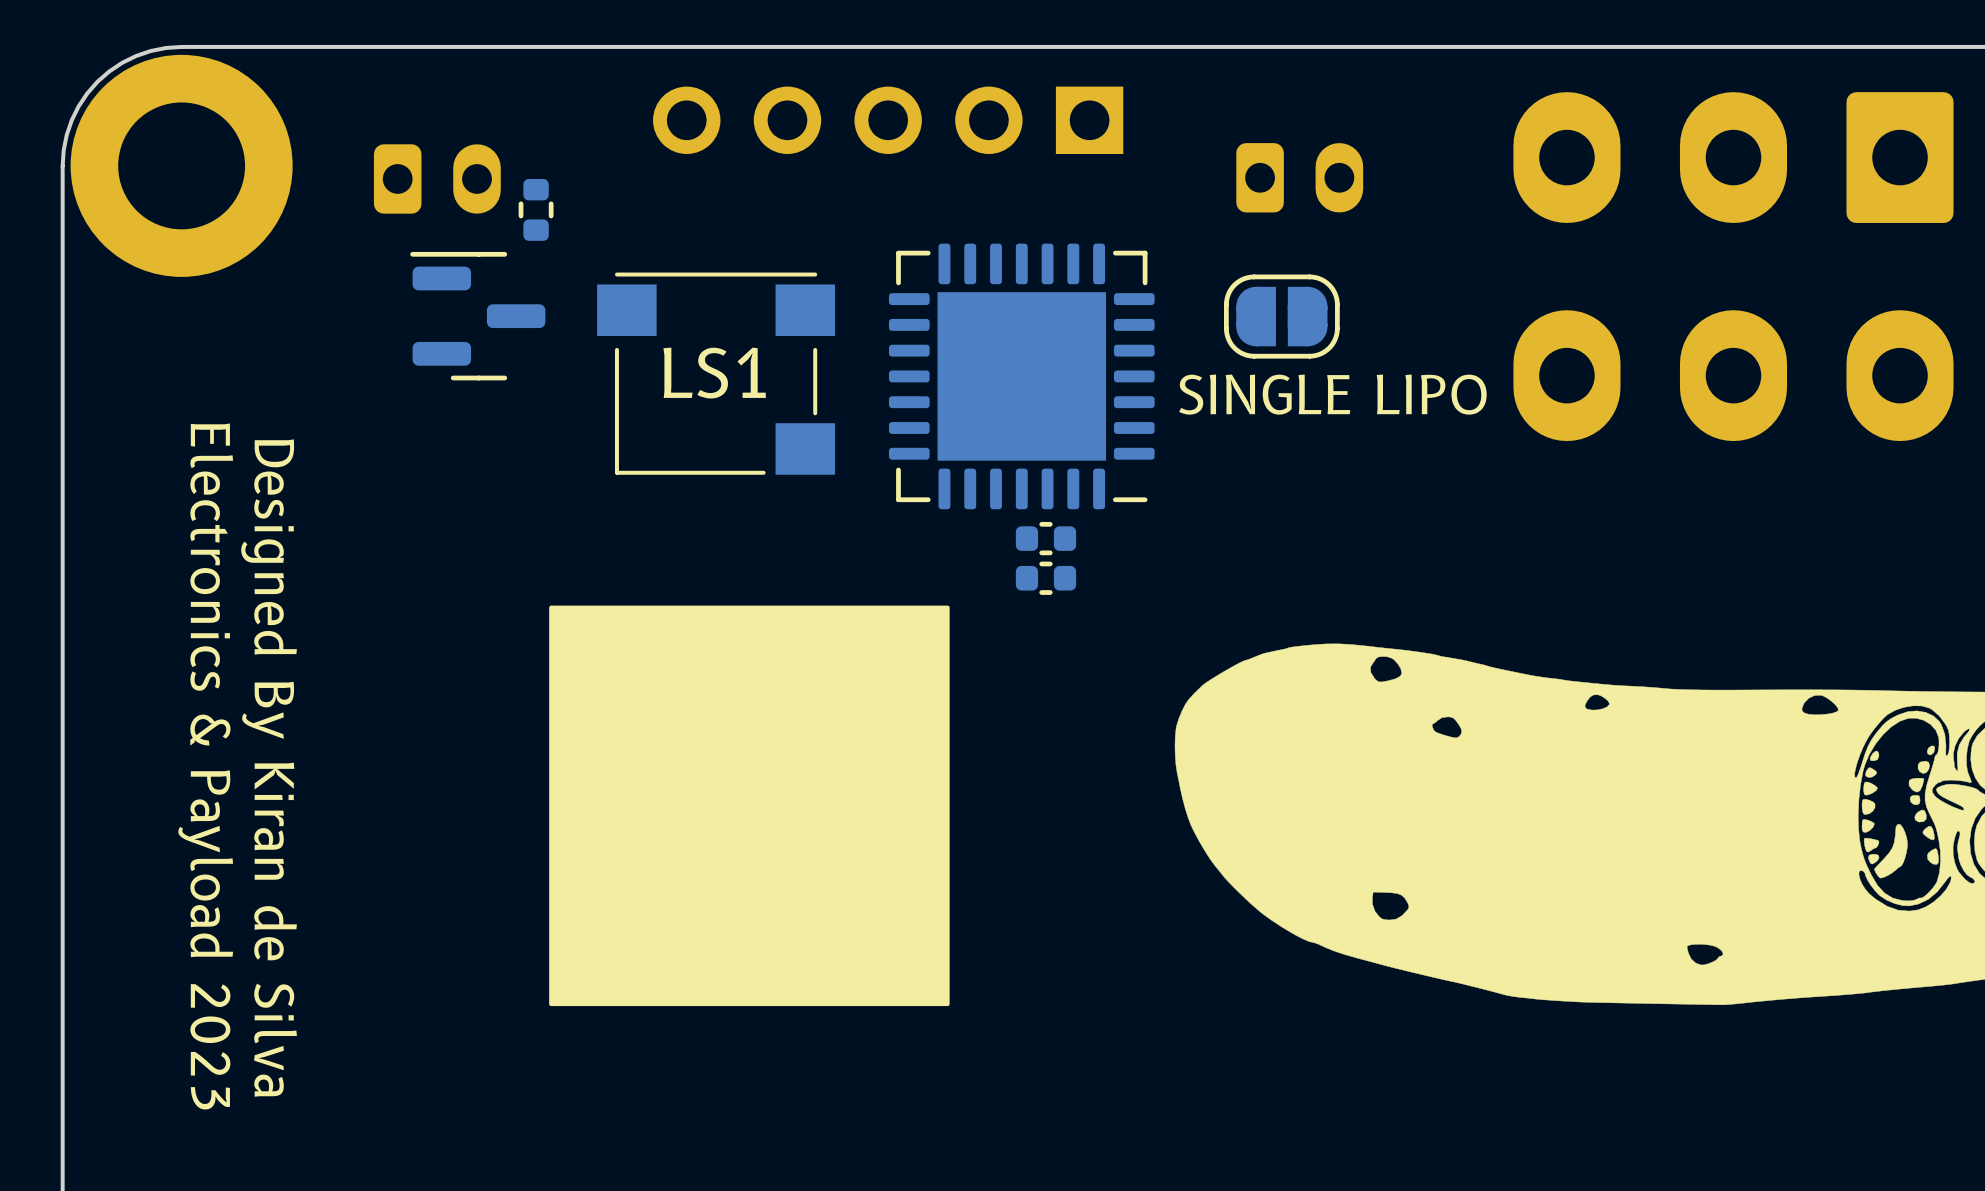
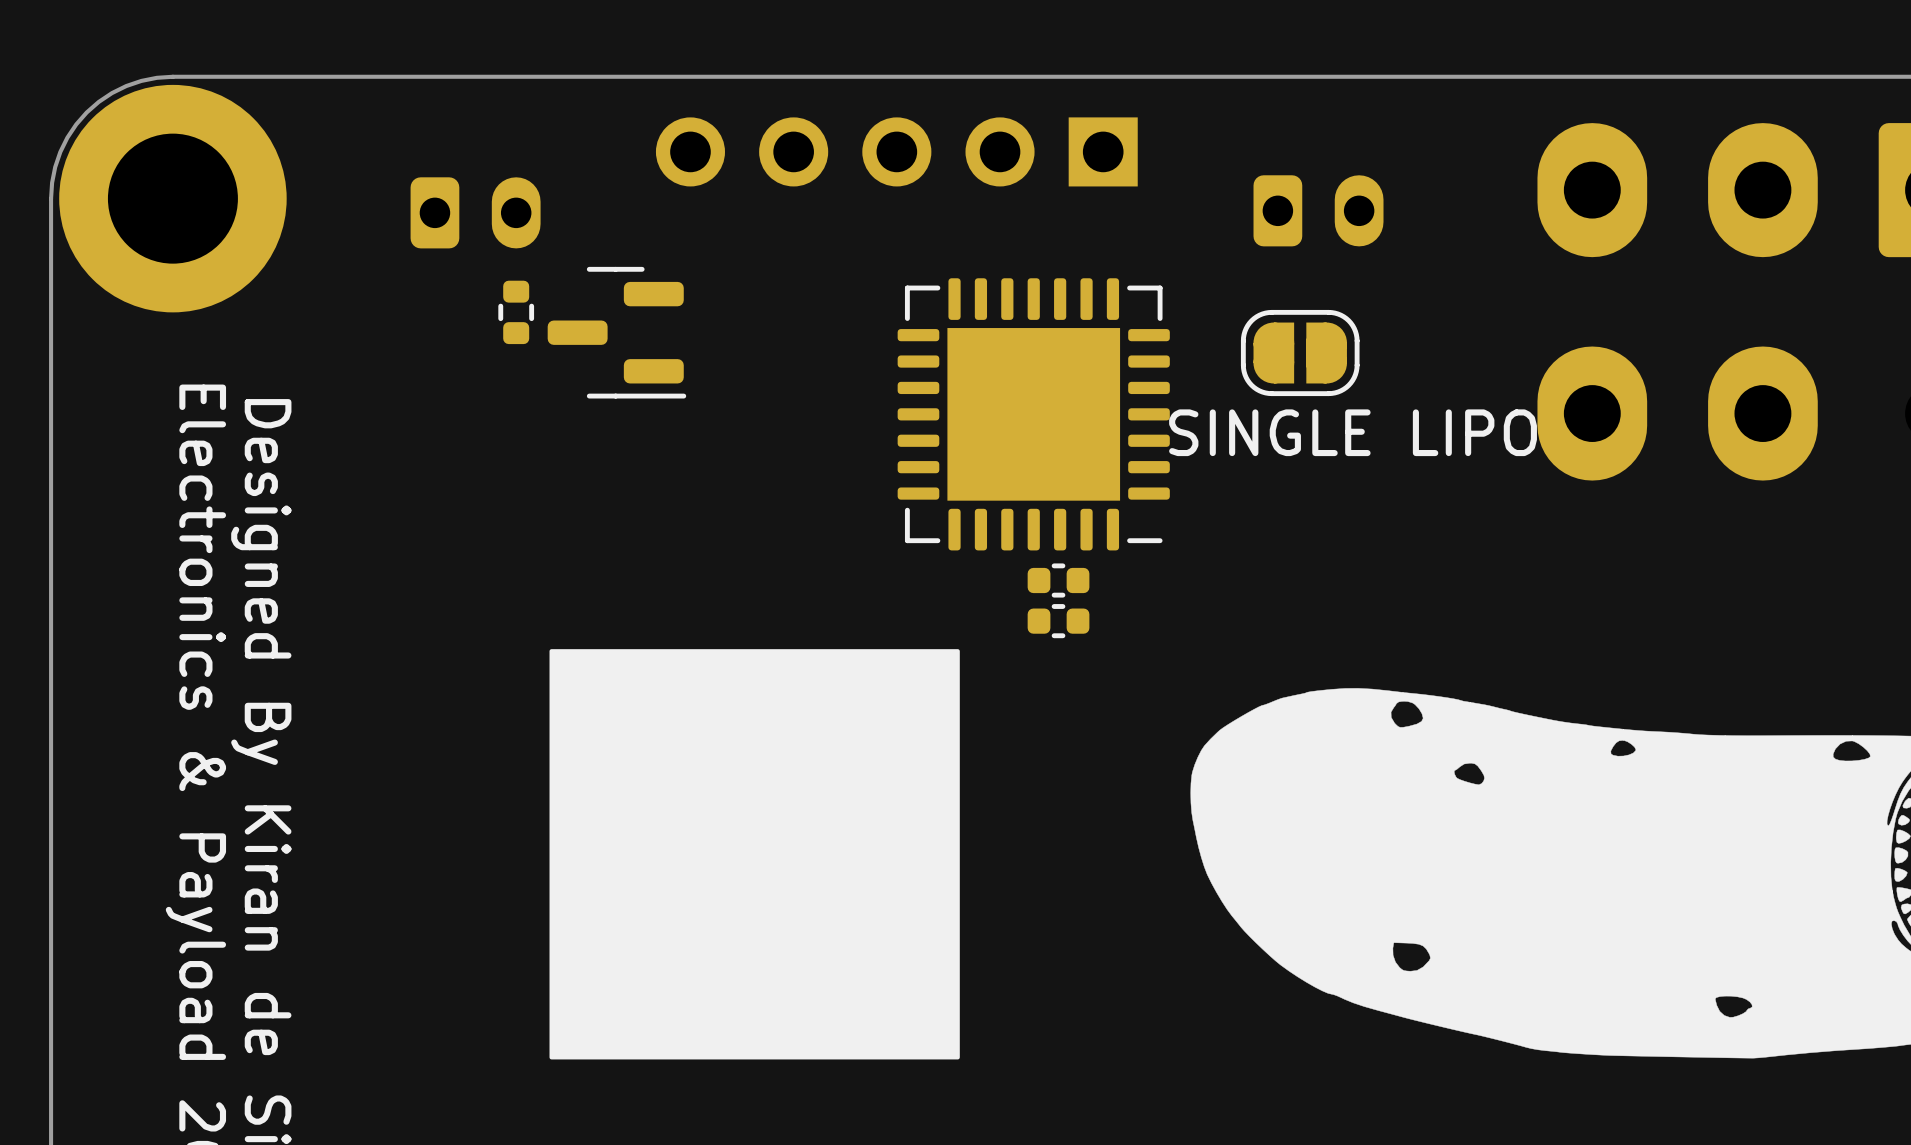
part position: (437, 178) -> (475, 212)
part position: (536, 209) -> (516, 312)
part rotation: 0° (477, 316) -> 180° (616, 332)
part position: (477, 316) -> (616, 332)
LS1: (716, 373) -> none

